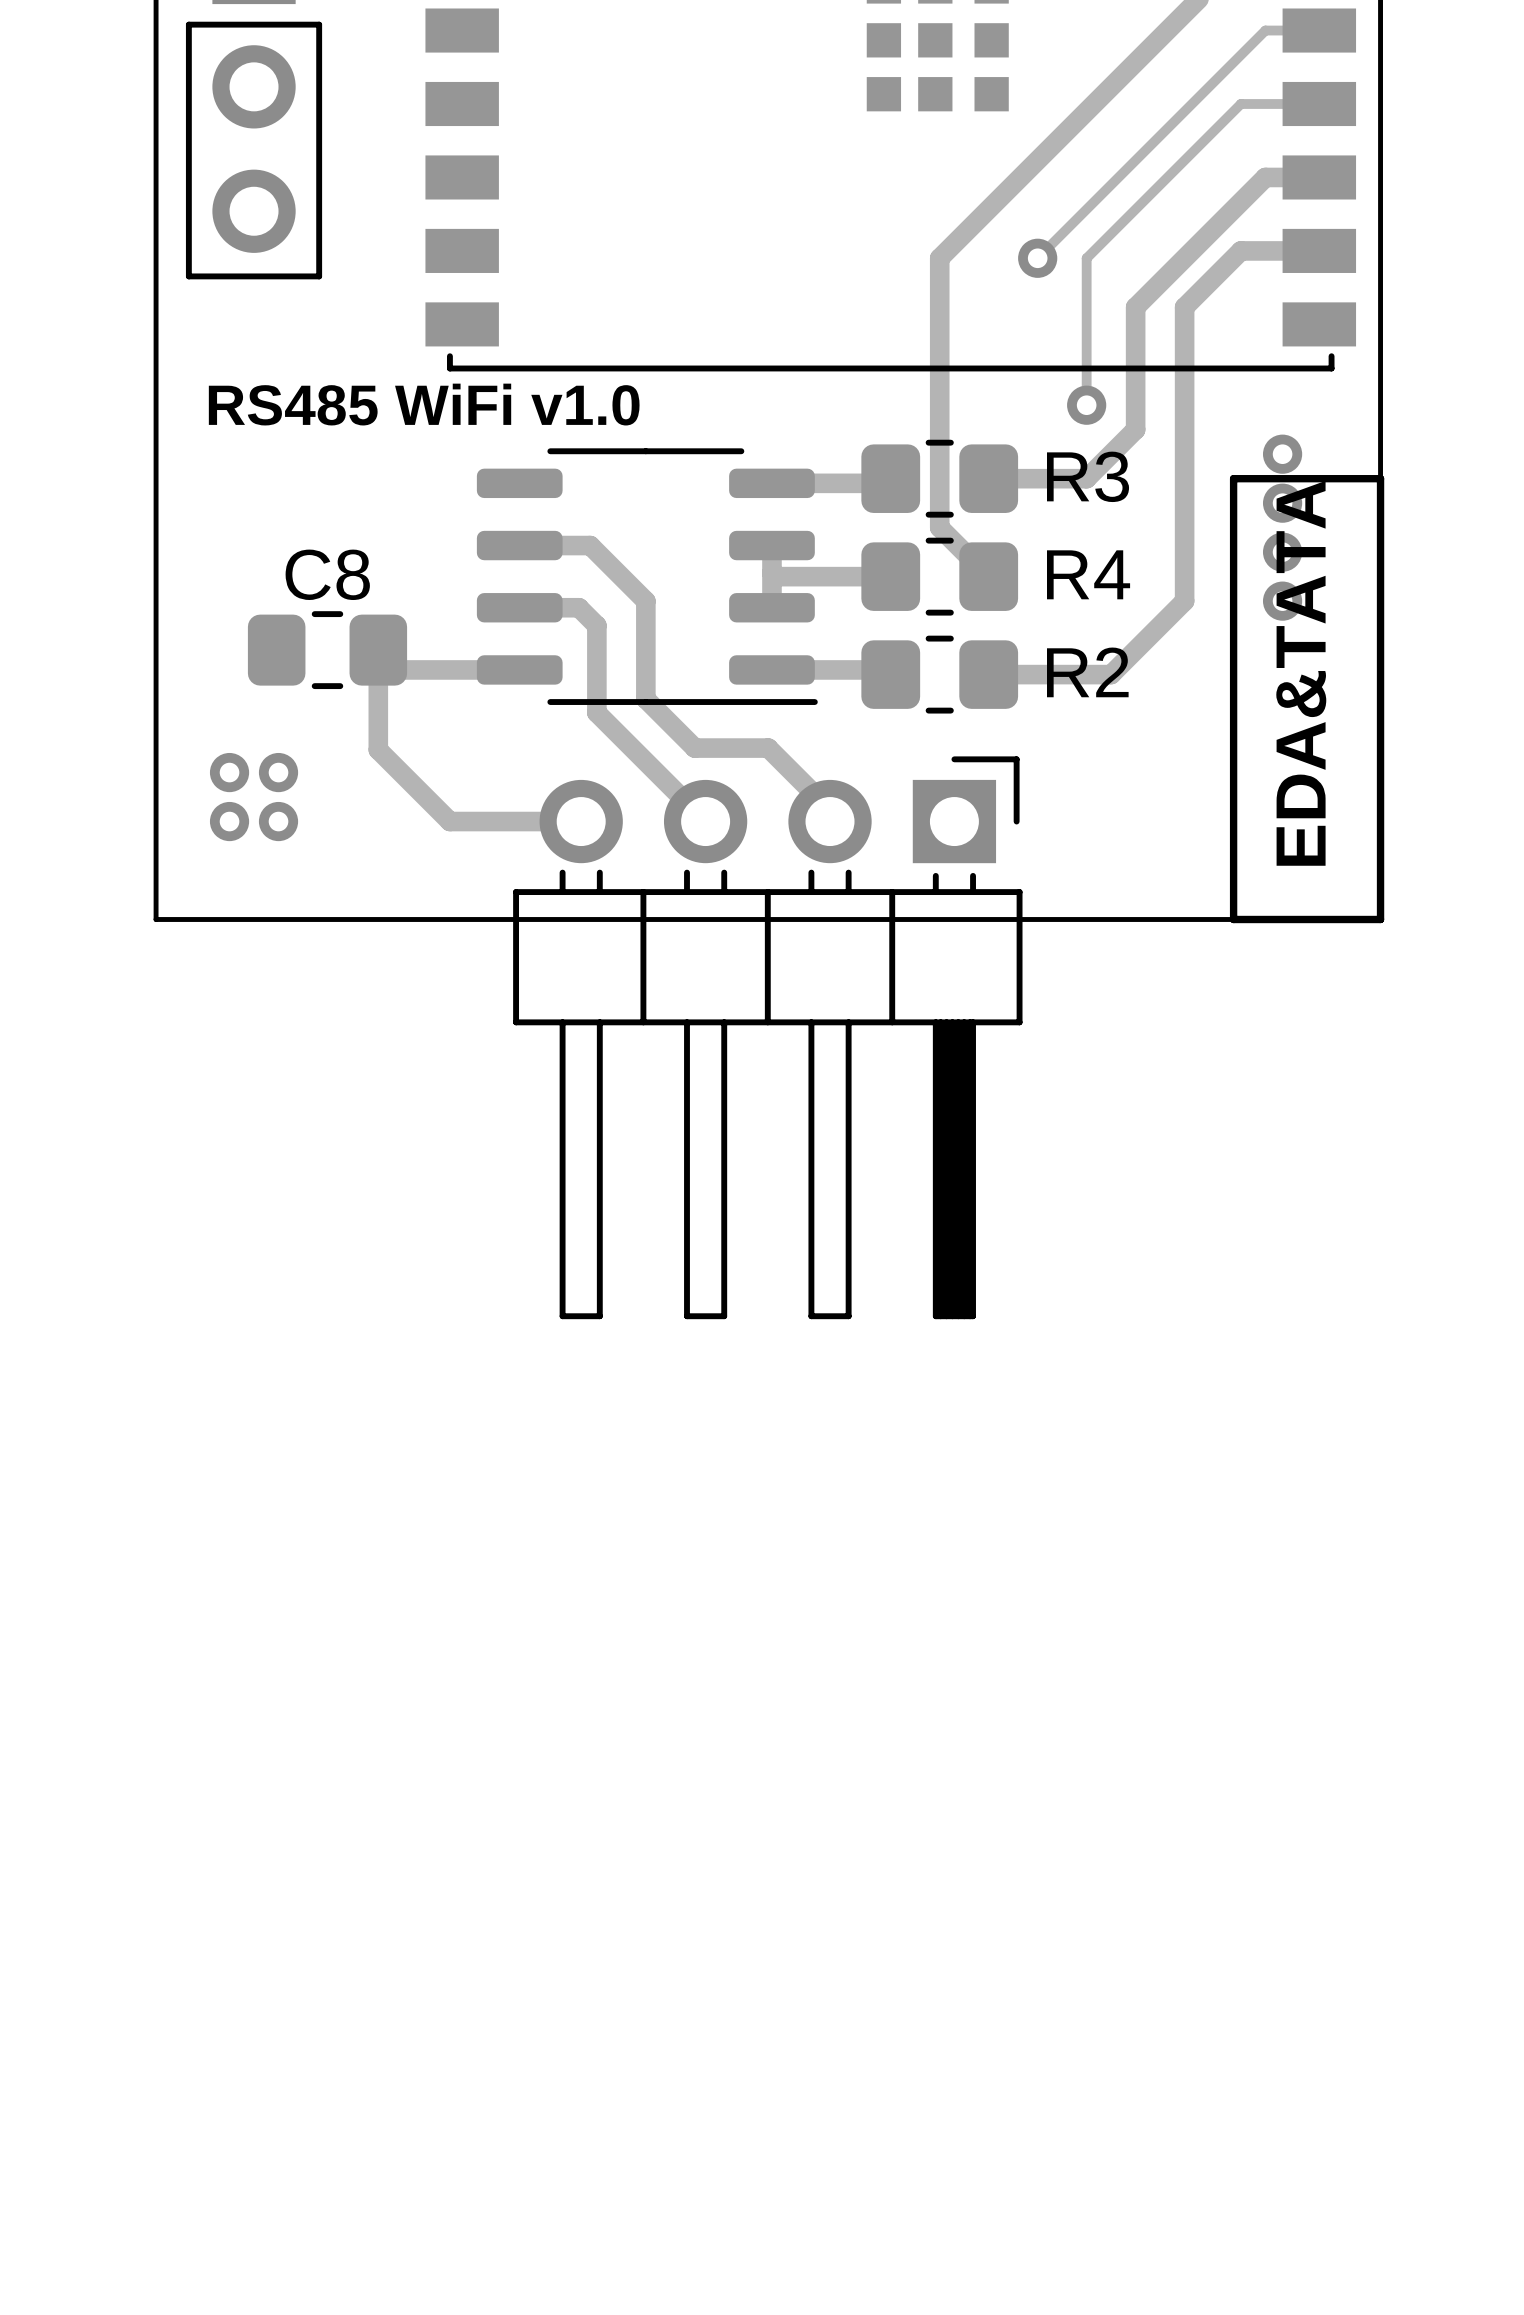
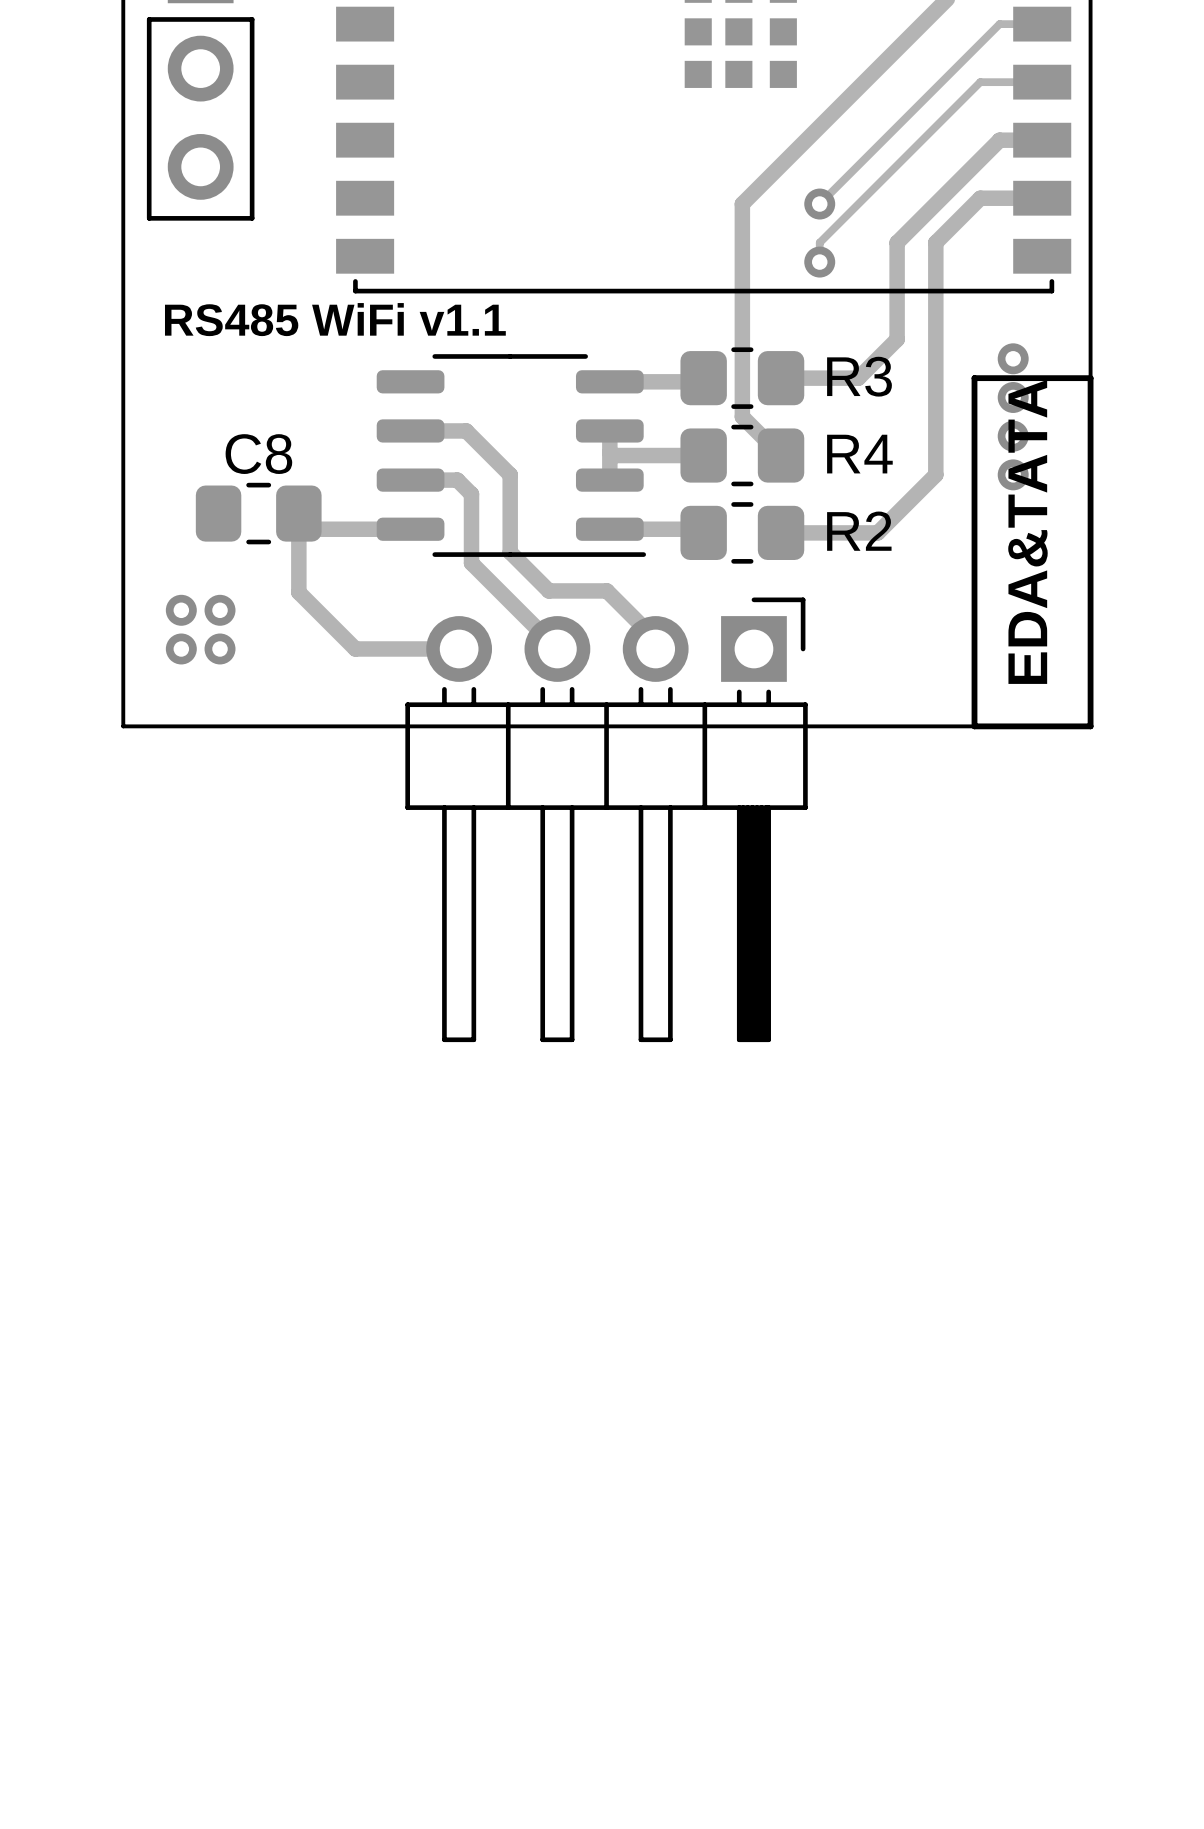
track: (1086, 258) (1086, 405) -> (858, 204) (819, 242) (819, 262)
text: RS485 WiFi v1.0 (424, 404) -> RS485 WiFi v1.1 (335, 319)
via position: (1086, 405) -> (819, 262)

